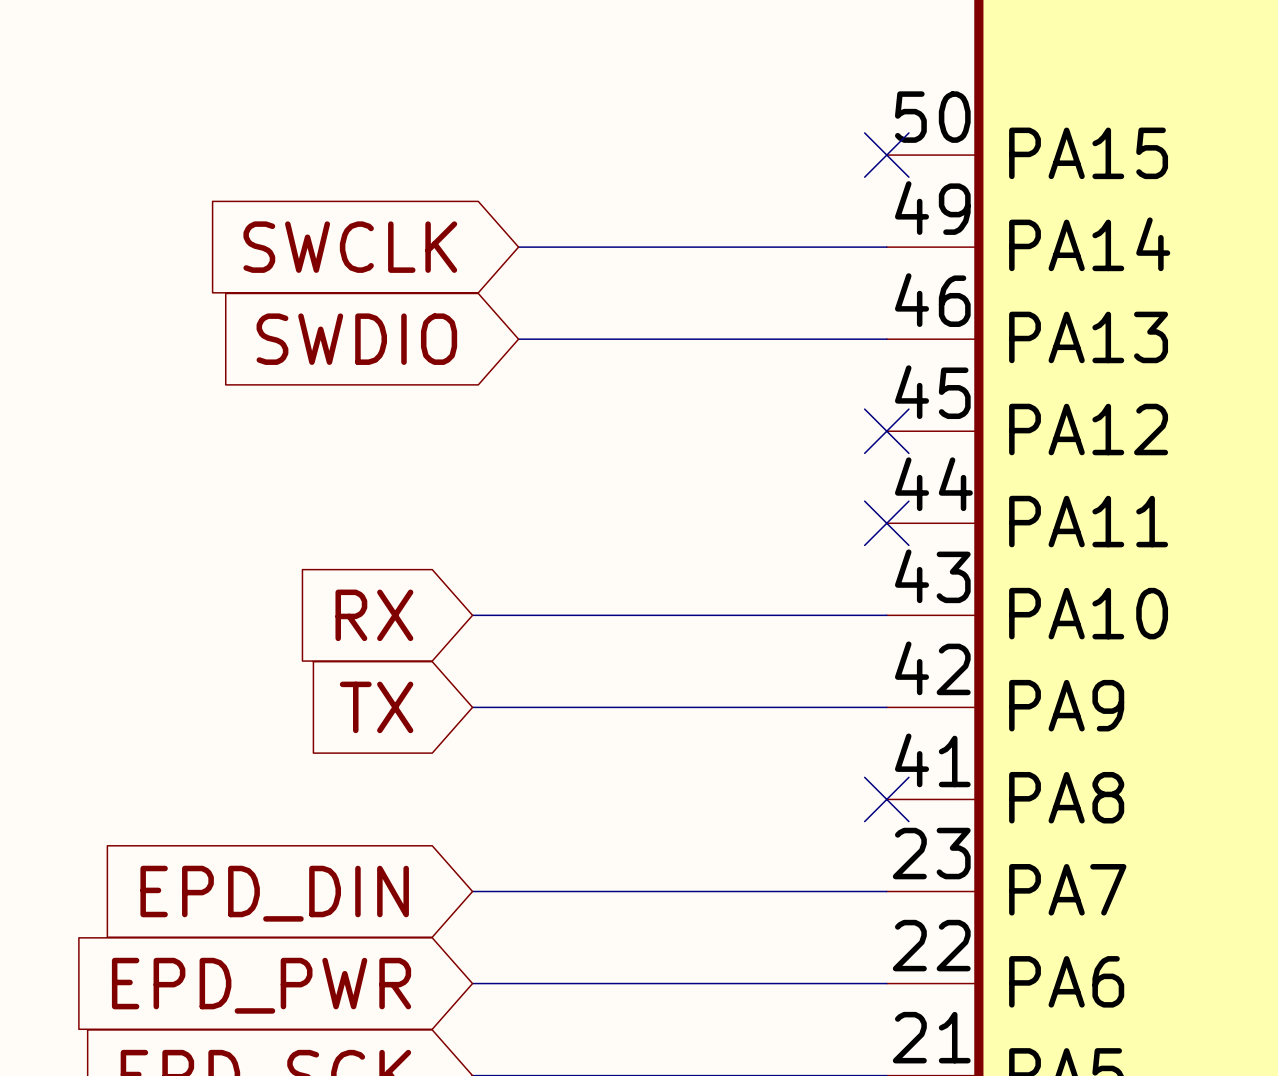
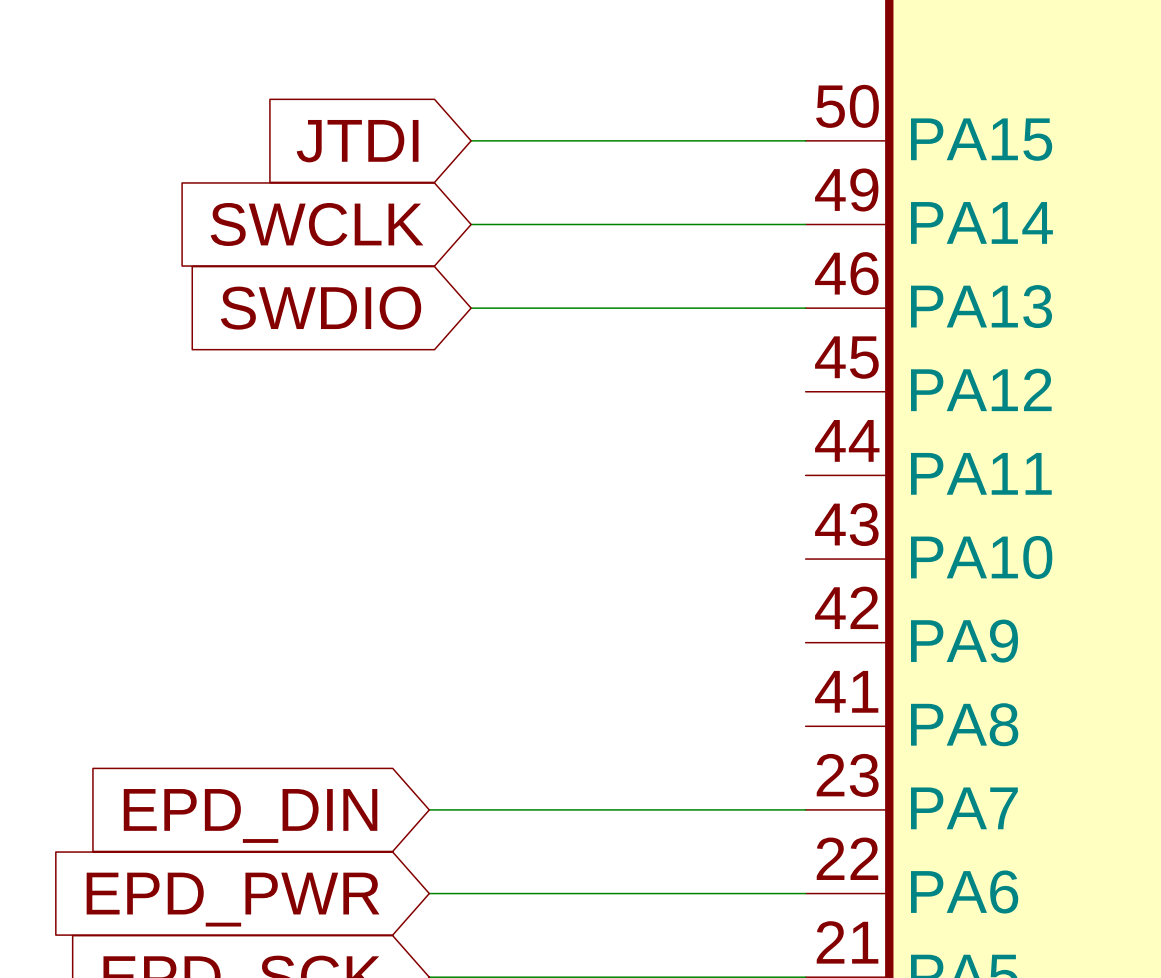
global label: none -> JTDI (357, 141)
wire: none -> (471, 140) (805, 140)
no-connect mark: (886, 155) -> none
no-connect mark: (886, 431) -> none
no-connect mark: (886, 523) -> none
global label: RX (374, 615) -> none
wire: (472, 615) (886, 615) -> none
global label: TX (376, 707) -> none
wire: (472, 707) (886, 707) -> none
no-connect mark: (886, 799) -> none

